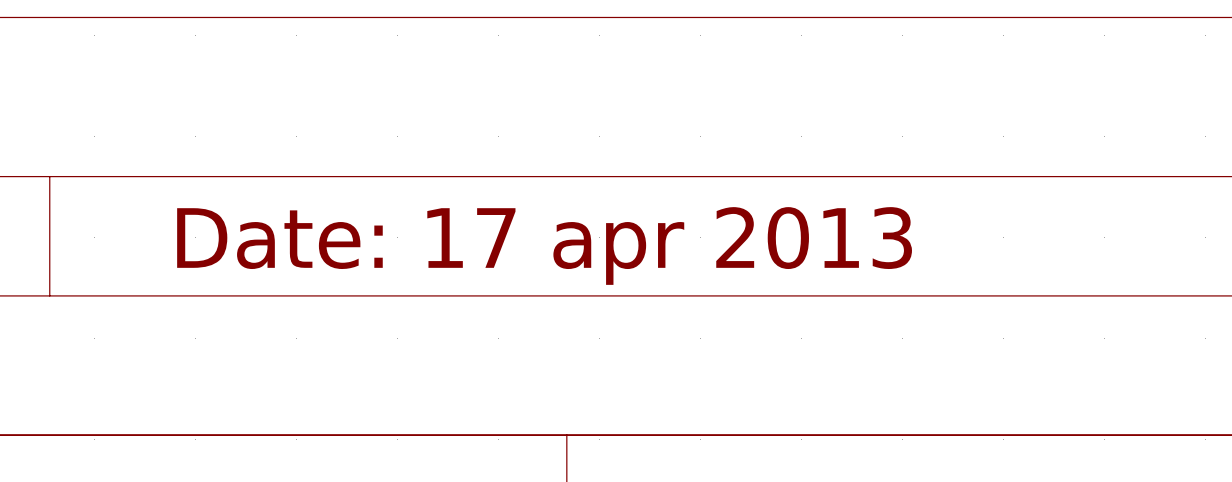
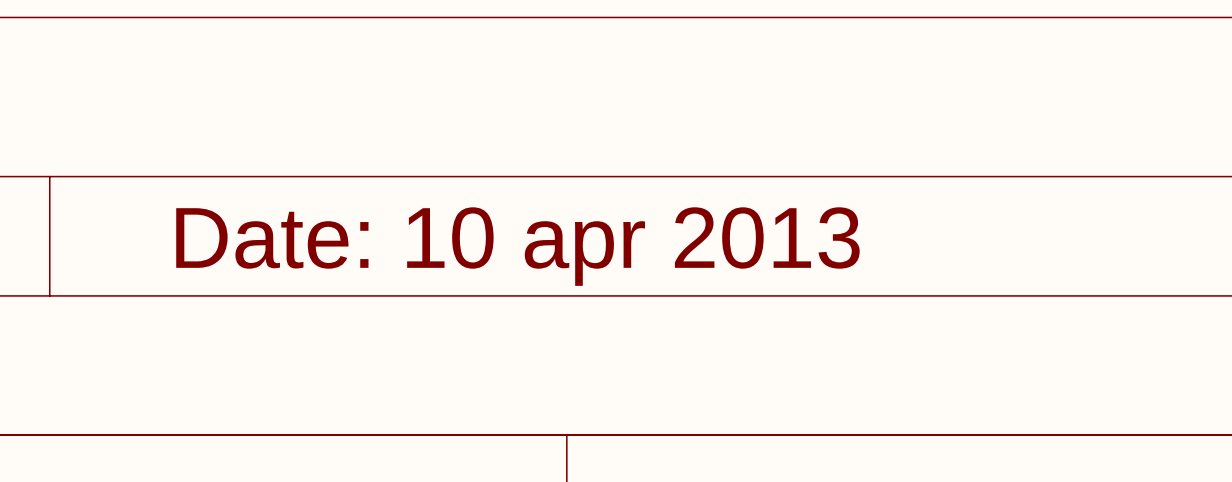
title block: Date: 17 apr 2013 (544, 245) -> Date: 10 apr 2013 (517, 246)

